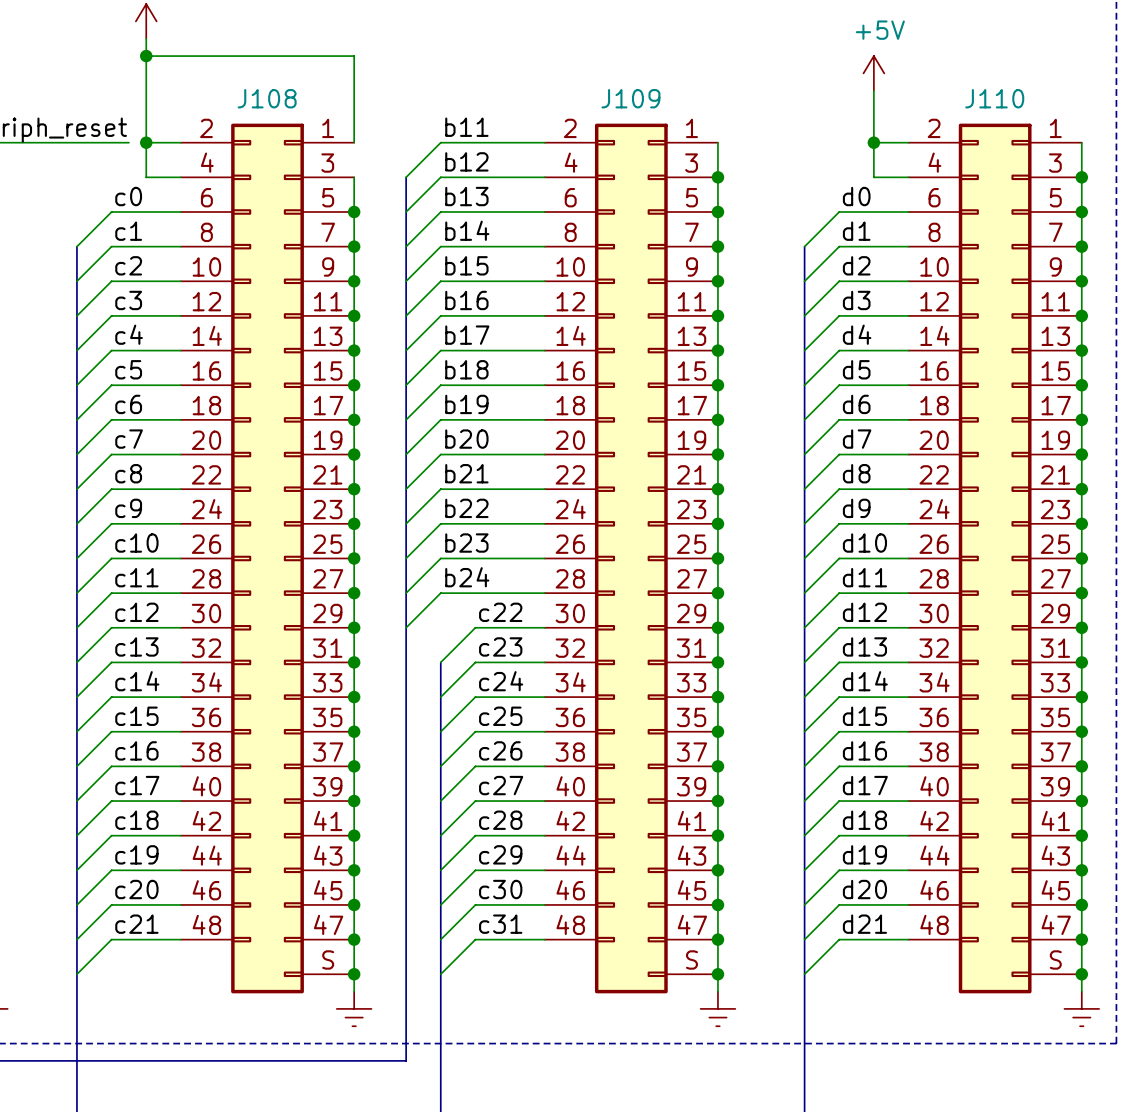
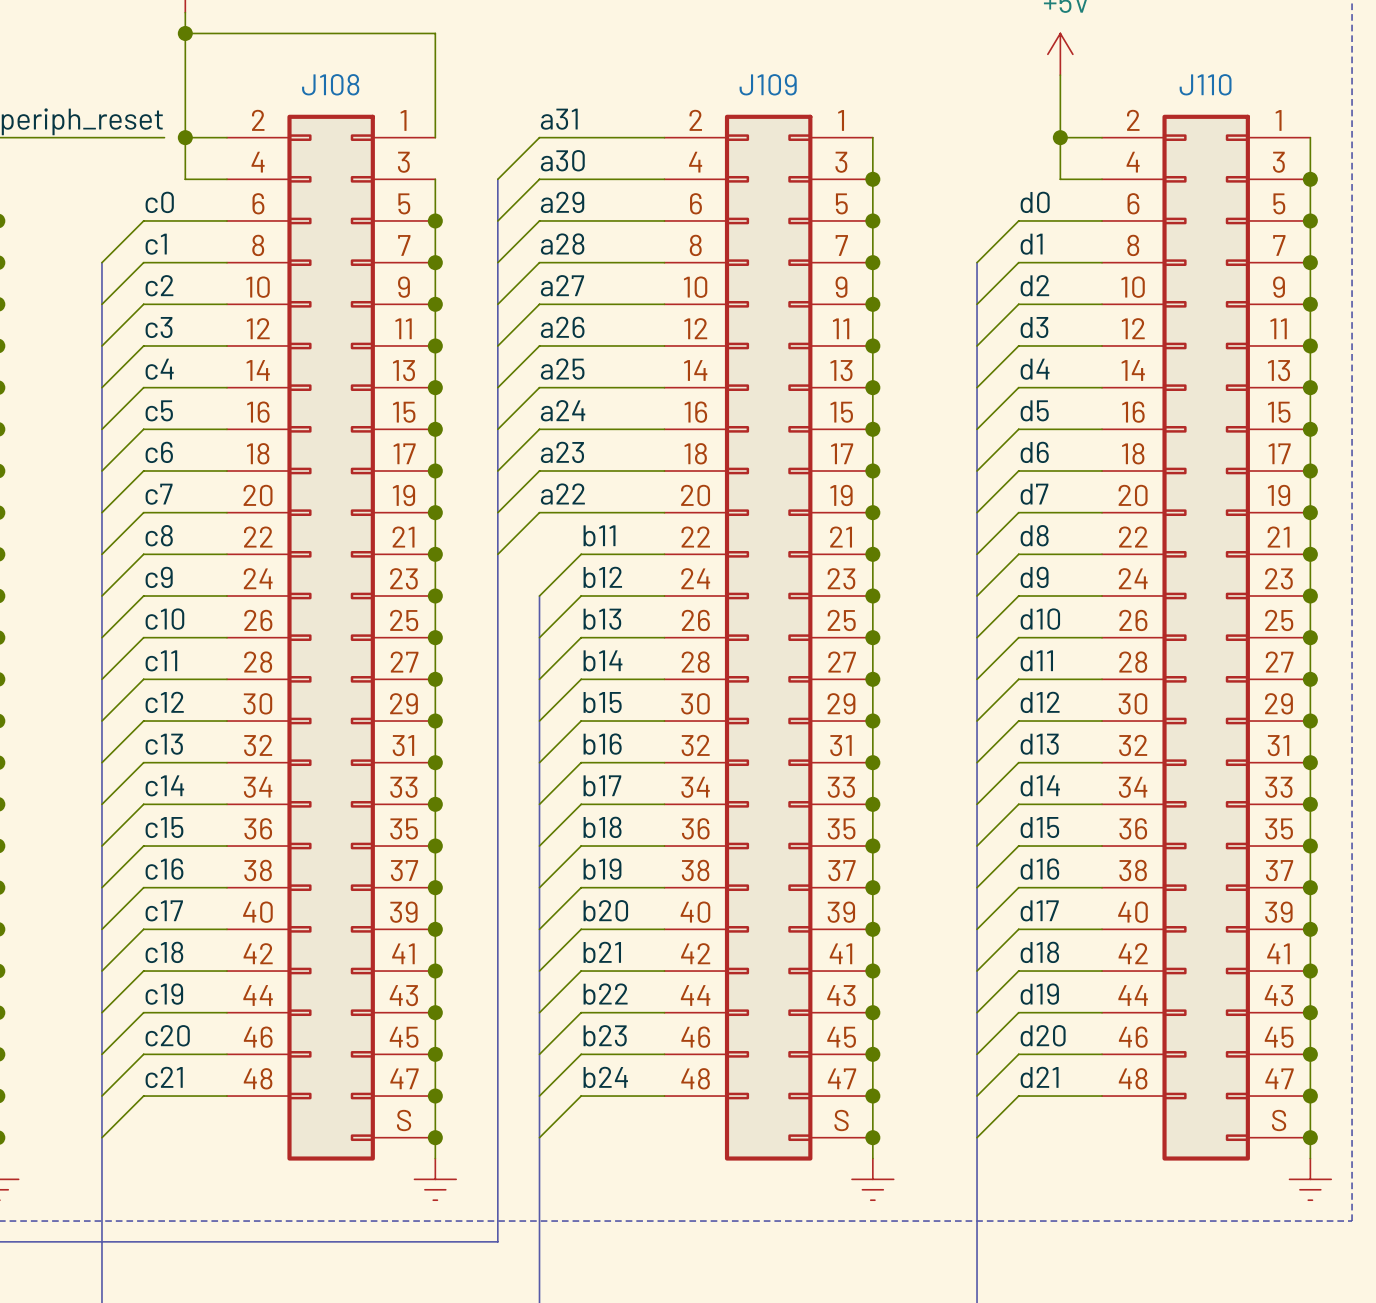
label: b11 (466, 127) -> a31 (559, 119)
label: b12 (466, 161) -> a30 (562, 160)
label: b13 (466, 196) -> a29 (562, 202)
label: b14 (467, 230) -> a28 (562, 244)
label: b15 (466, 265) -> a27 (562, 285)
label: b16 (466, 300) -> a26 (562, 327)
label: b17 (467, 335) -> a25 (562, 369)
label: b18 (466, 369) -> a24 (563, 410)
label: b19 (466, 404) -> a23 (562, 452)
label: b20 (466, 439) -> a22 (562, 494)
label: b21 (466, 473) -> none
label: none -> b11 (599, 535)
wire: (475, 489) (440, 489) (406, 523) -> (581, 554) (539, 596)
label: b22 (466, 508) -> none
label: none -> b12 (602, 577)
bus: none -> (539, 596) (539, 762)
wire: (475, 523) (440, 523) (406, 558) -> (581, 596) (539, 637)
label: b23 (466, 543) -> none
label: none -> b13 (602, 619)
wire: (475, 558) (440, 558) (406, 593) -> (581, 637) (539, 679)
label: b24 (467, 577) -> b14 (602, 660)
wire: (475, 593) (440, 593) (406, 627) -> (581, 679) (539, 721)
label: c22 (500, 612) -> b15 (602, 702)
label: c23 (500, 646) -> b16 (602, 744)
label: c24 (501, 681) -> b17 (602, 785)
label: c25 (500, 716) -> b18 (602, 827)
label: c26 (500, 750) -> b19 (602, 869)
label: c27 (501, 785) -> b20 (605, 910)
label: c28 (500, 820) -> b21 (602, 952)
label: c29 (500, 854) -> b22 (605, 994)
label: c30 (500, 889) -> b23 (605, 1035)
label: c31 (500, 924) -> b24 (605, 1077)

